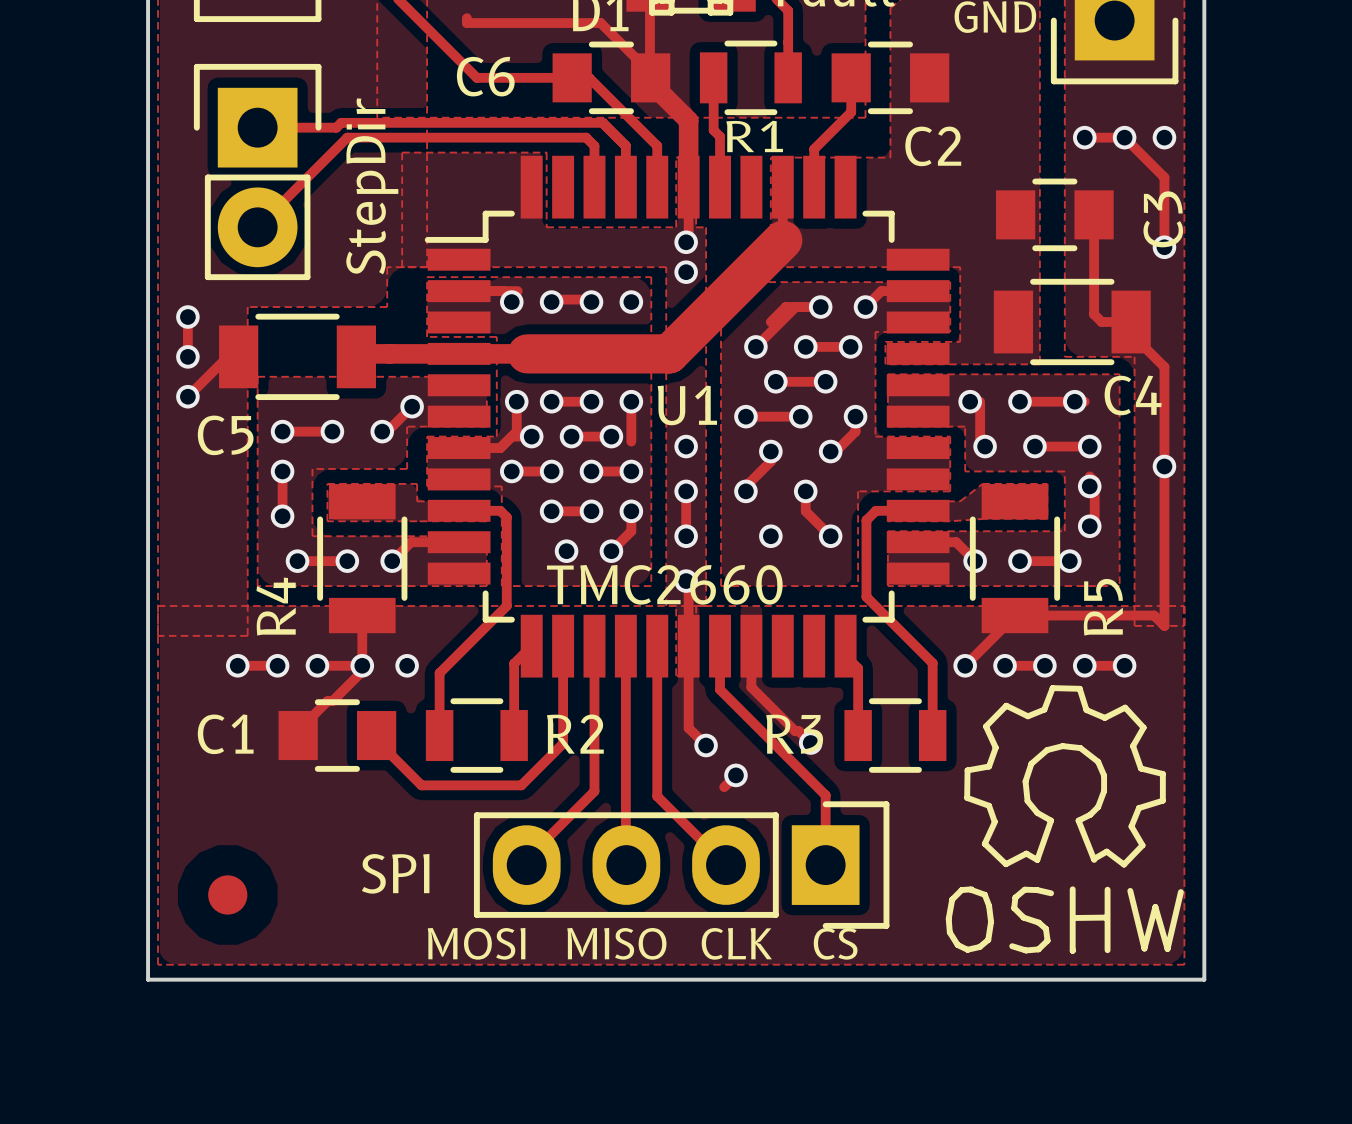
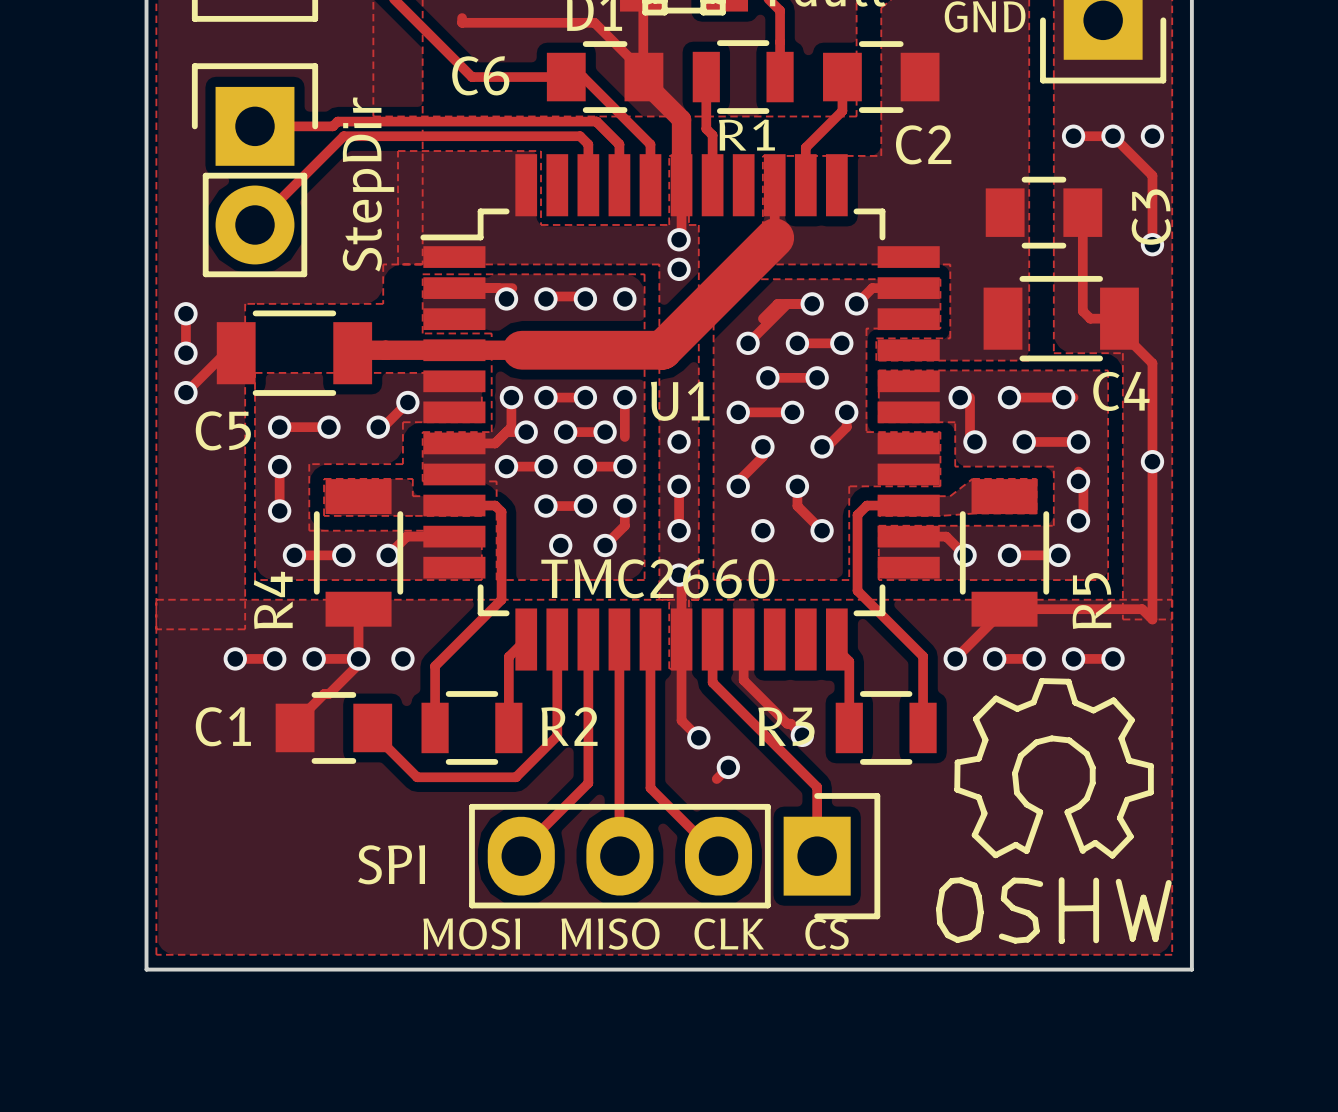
part: (227, 894) -> none

